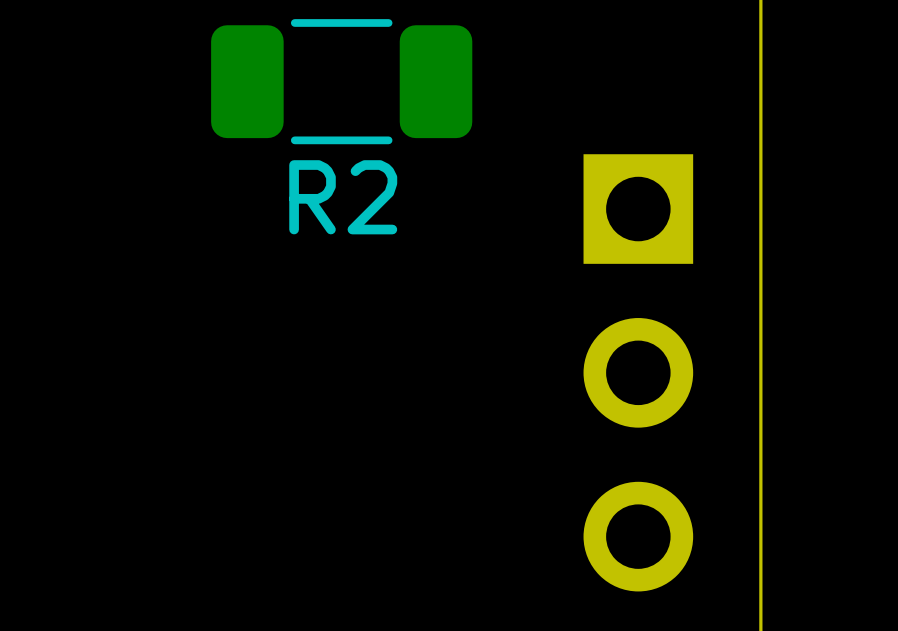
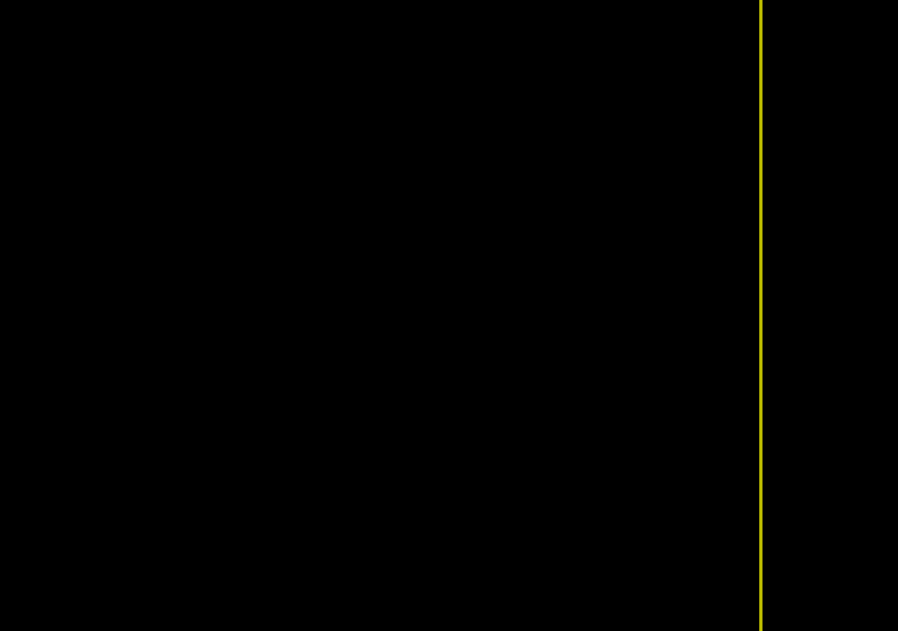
R2: (341, 81) -> none
part: (638, 372) -> none

